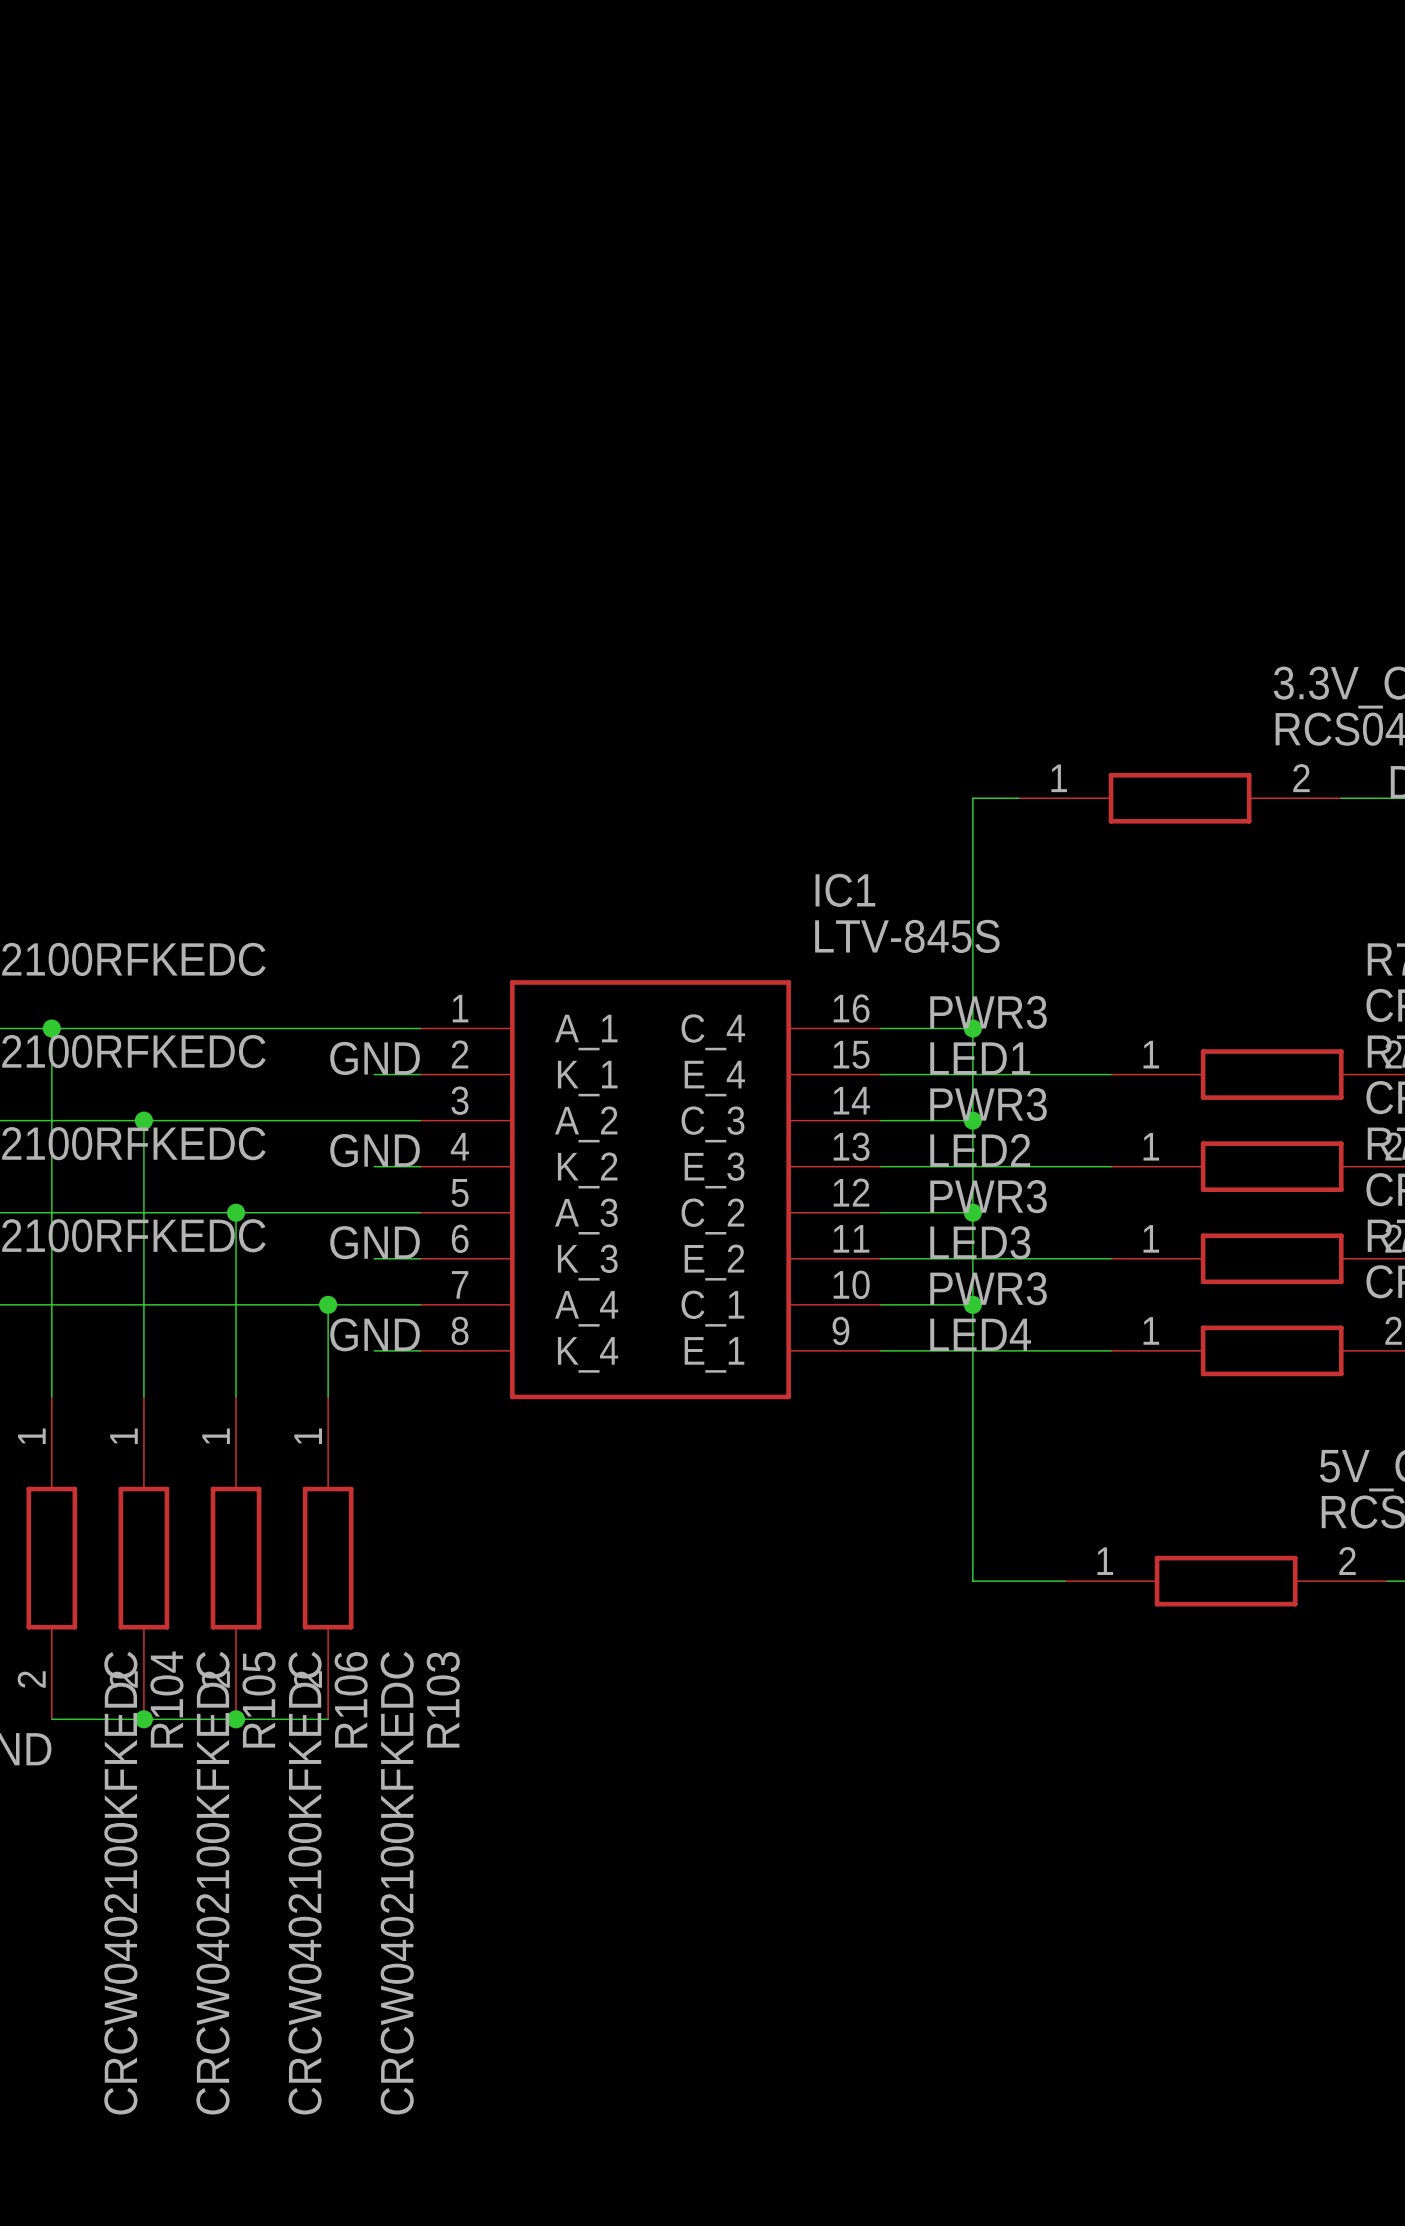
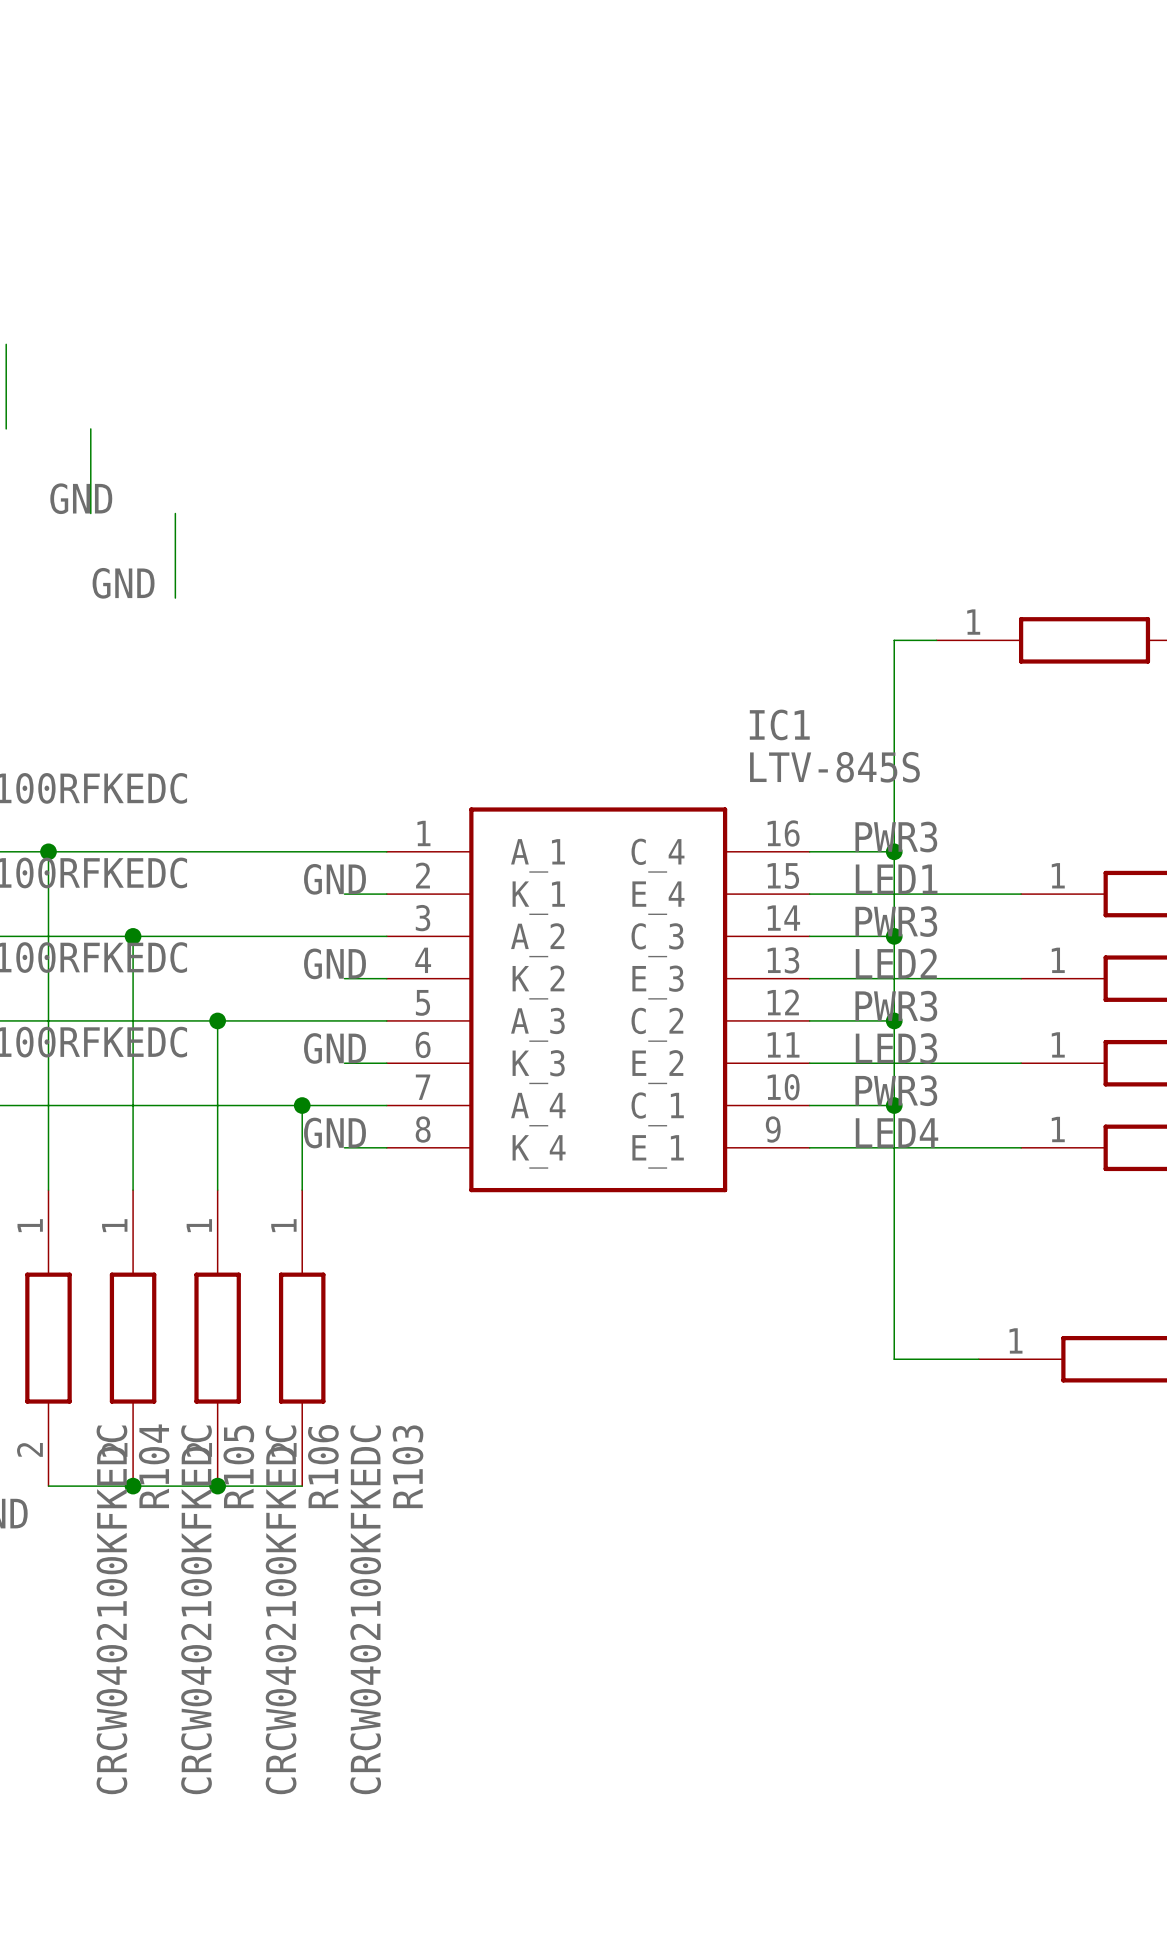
wire: none -> (6, 344) (6, 428)
wire: none -> (90, 428) (90, 513)
label: none -> GND (81, 498)
wire: none -> (175, 513) (175, 598)
label: none -> GND (123, 583)

